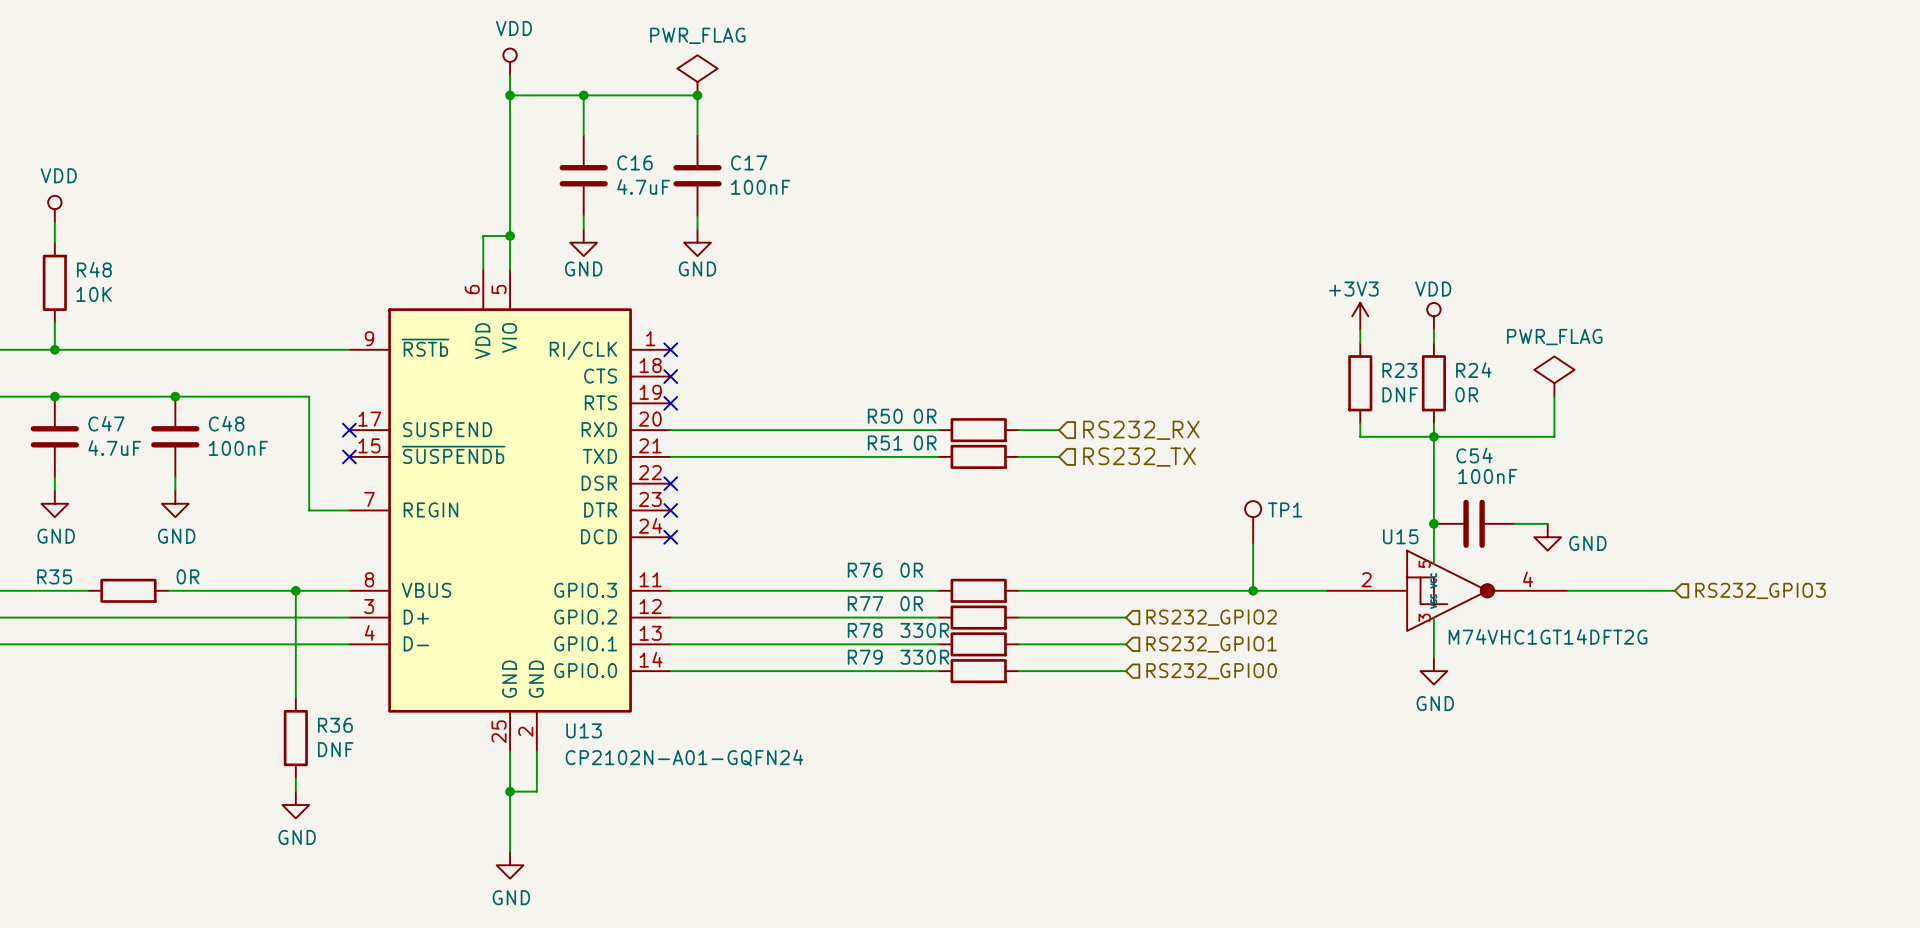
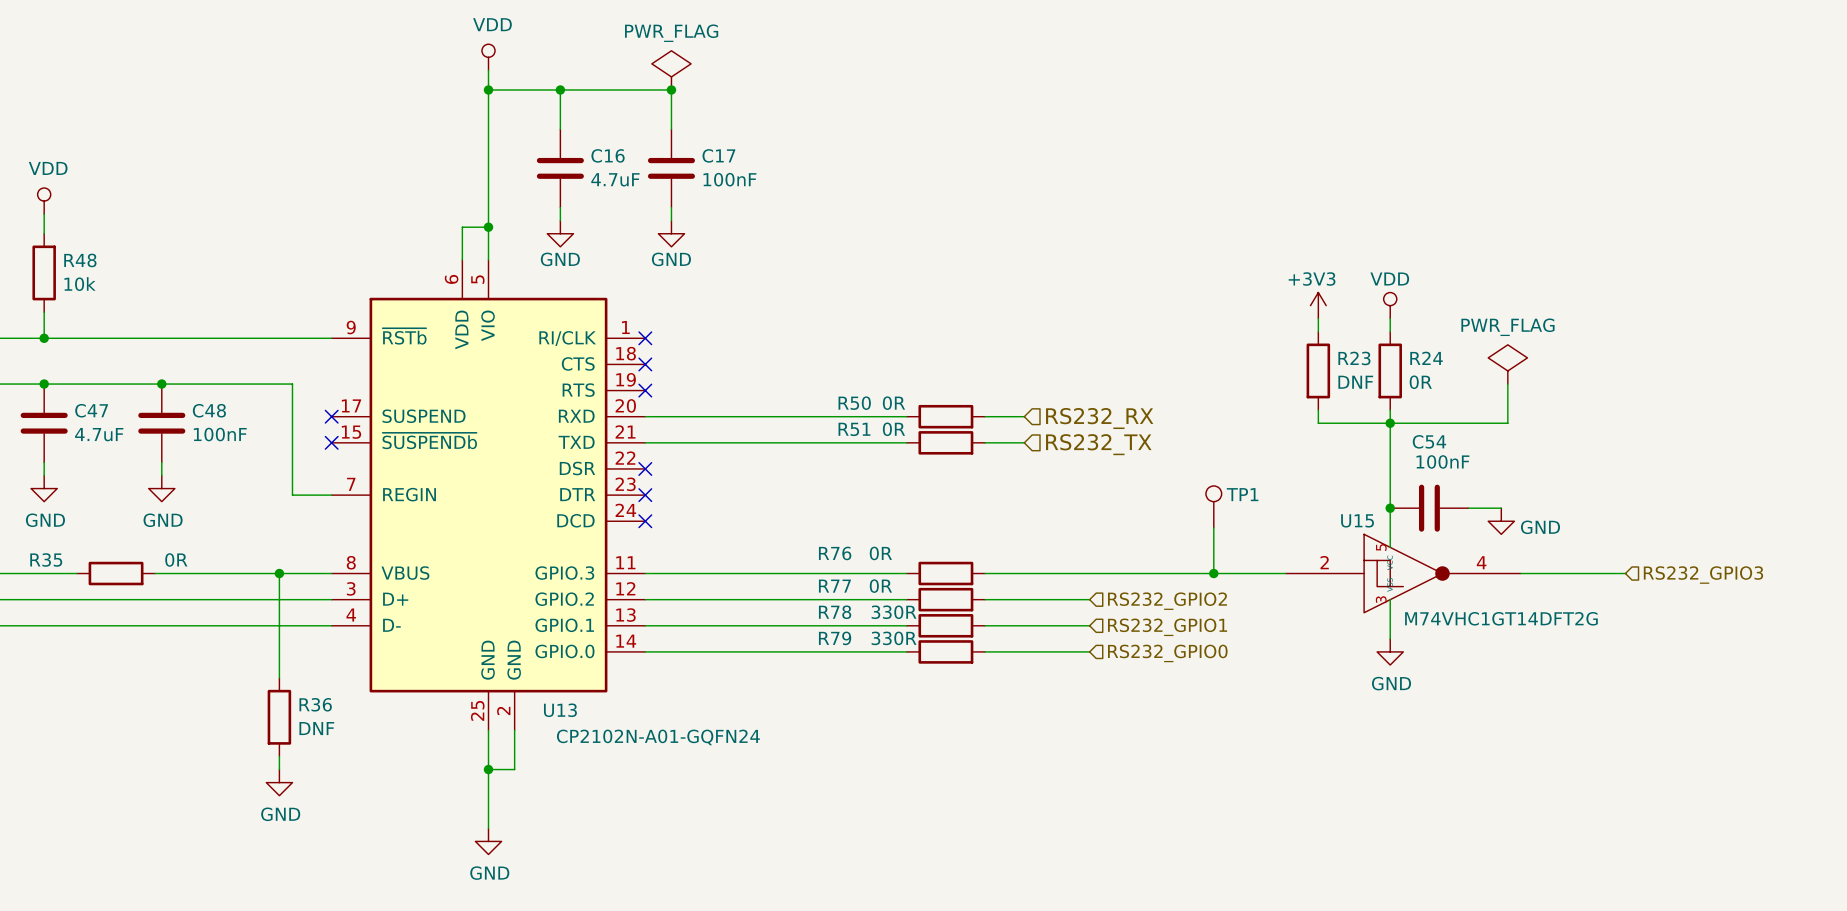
R48 value: 10K (94, 294) -> 10k (80, 284)

